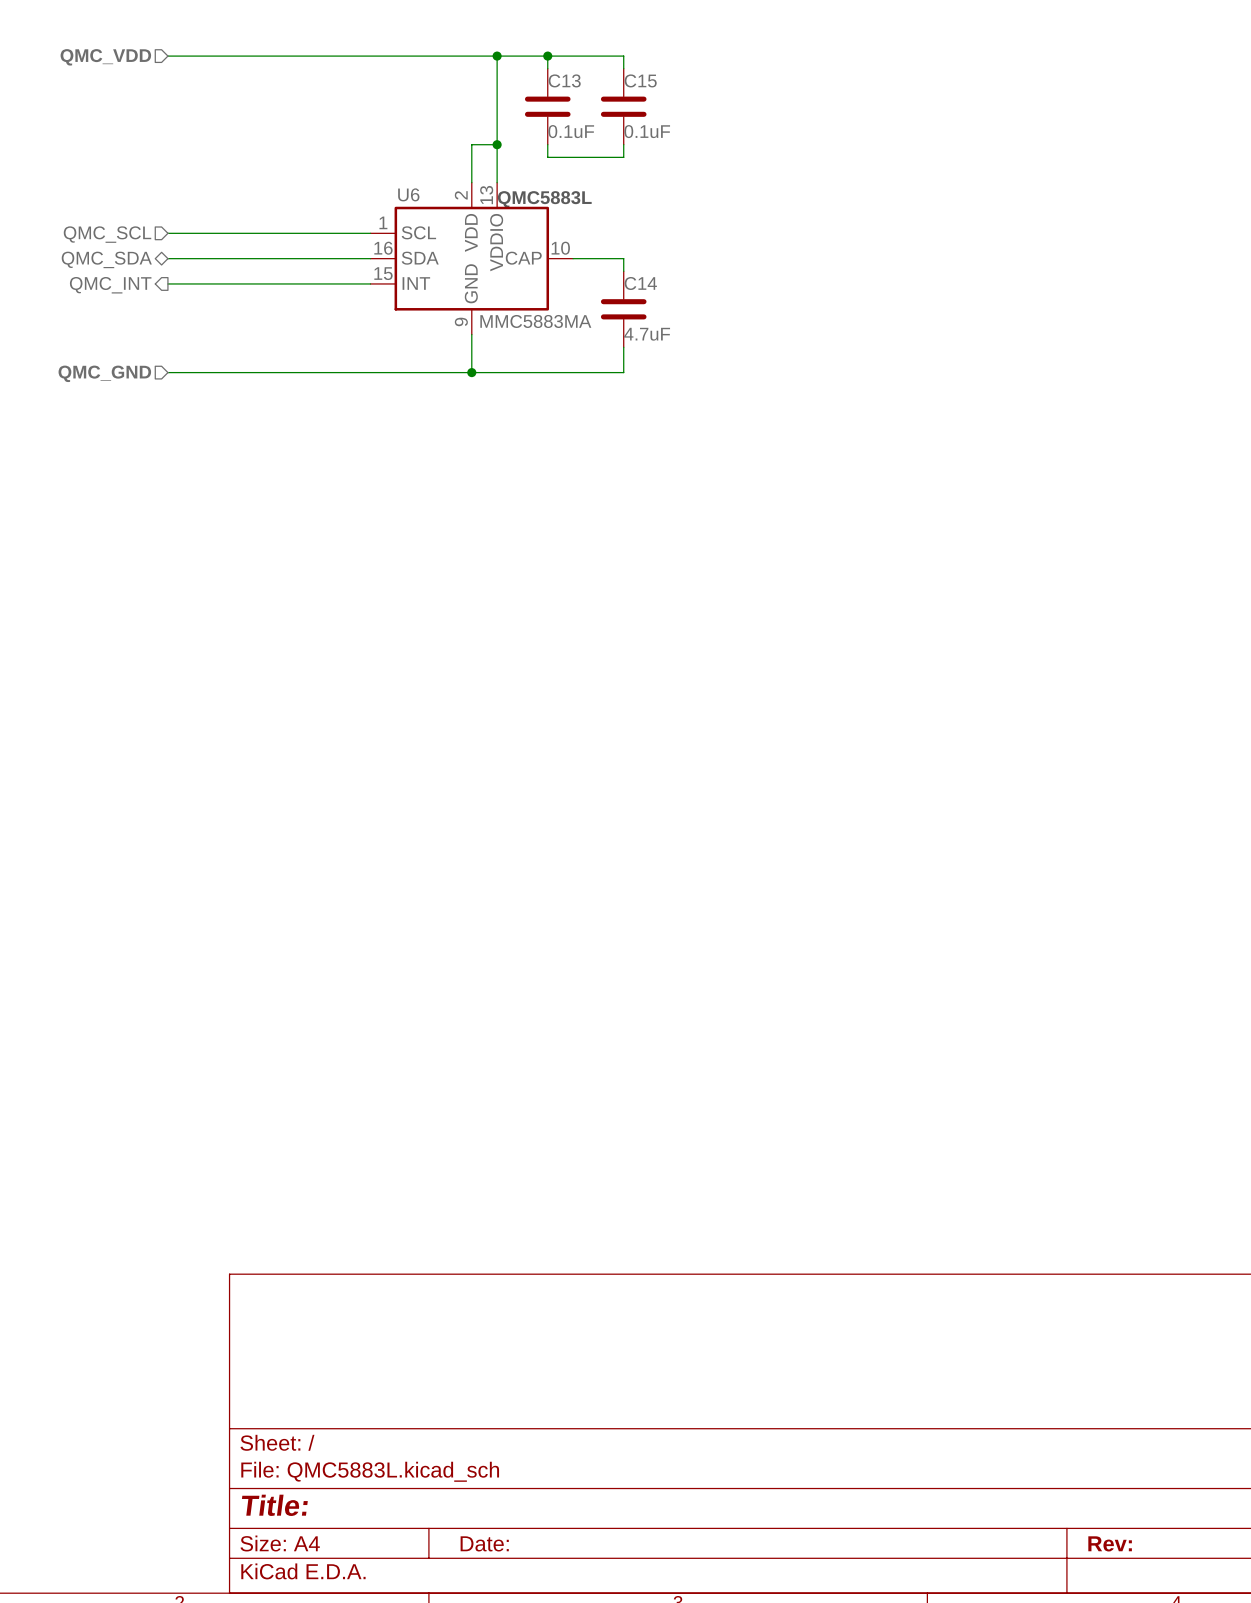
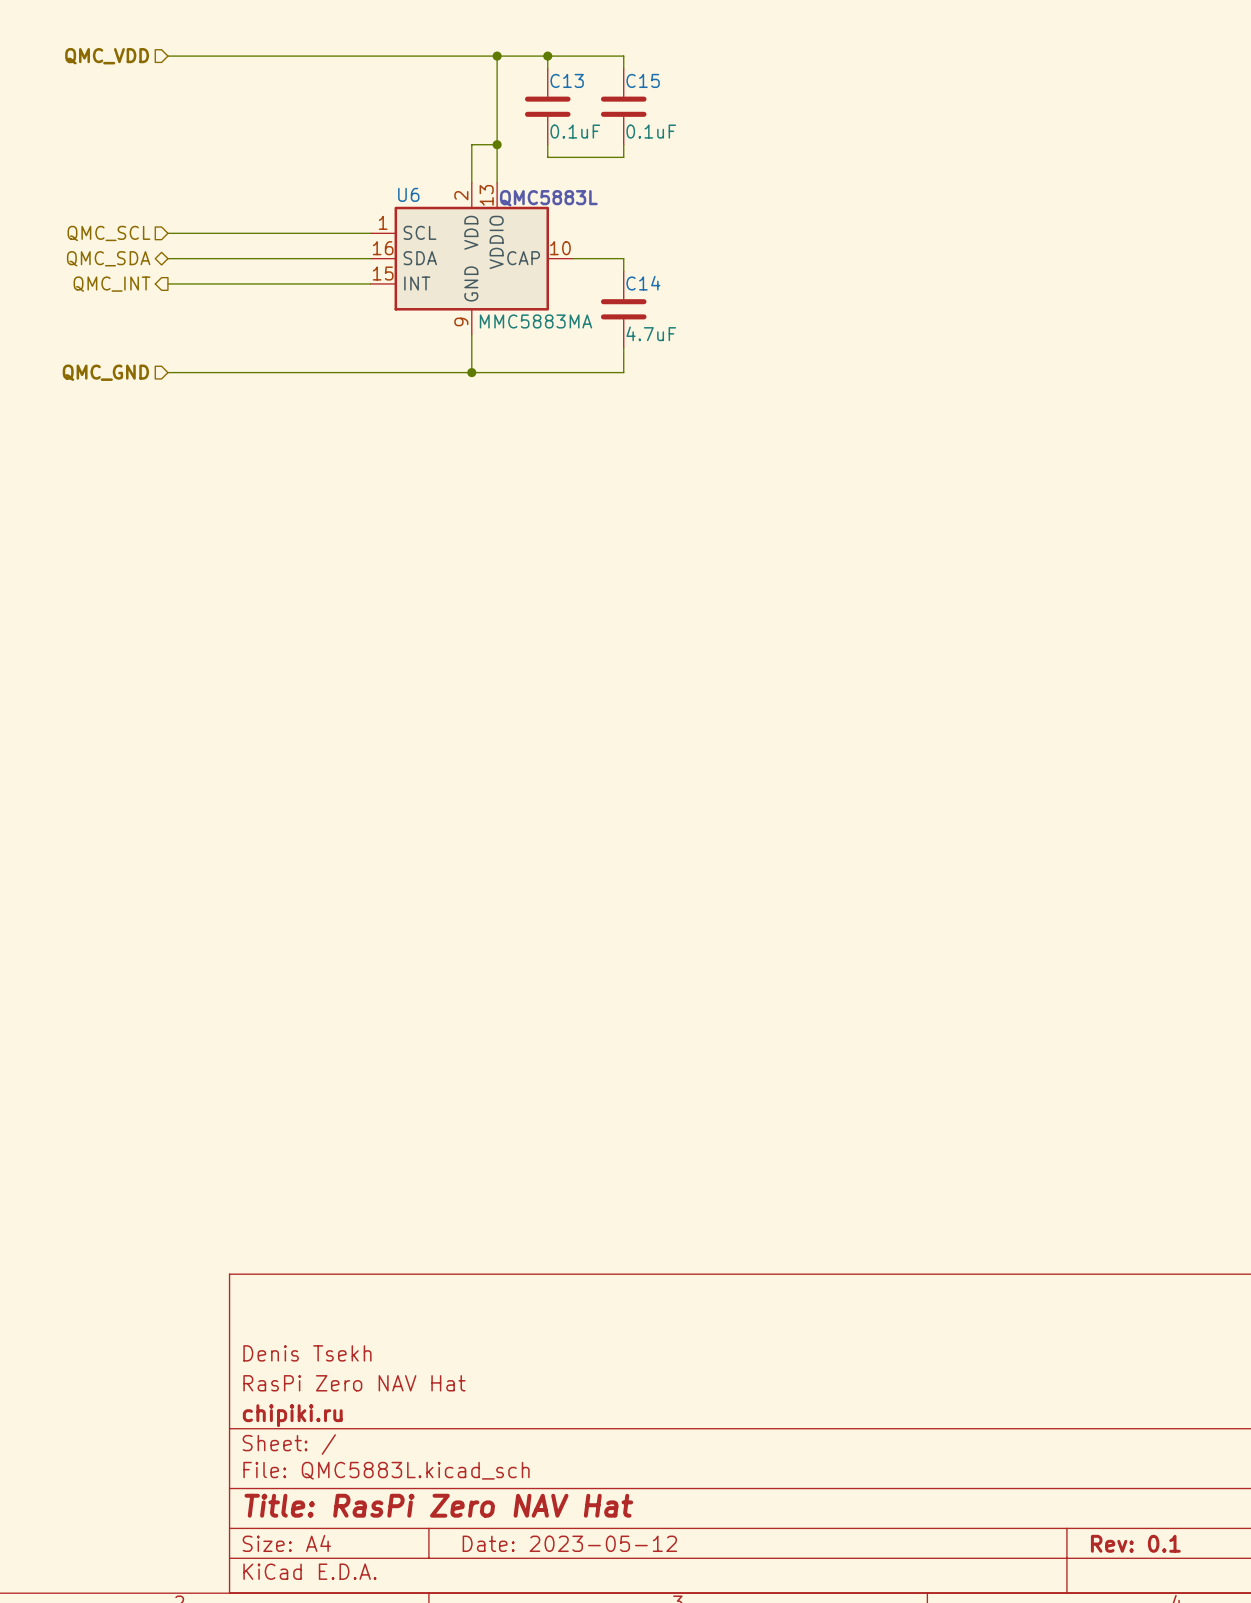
title block: none -> Denis Tsekh (307, 1353)
title block: none -> RasPi Zero NAV Hat (354, 1383)
title block: none -> chipiki.ru (292, 1415)
title block: Title: (274, 1505) -> Title: RasPi Zero NAV Hat (438, 1505)
title block: Date: (484, 1543) -> Date: 2023-05-12 (569, 1543)
title block: Rev: (1110, 1543) -> Rev: 0.1 (1135, 1543)

